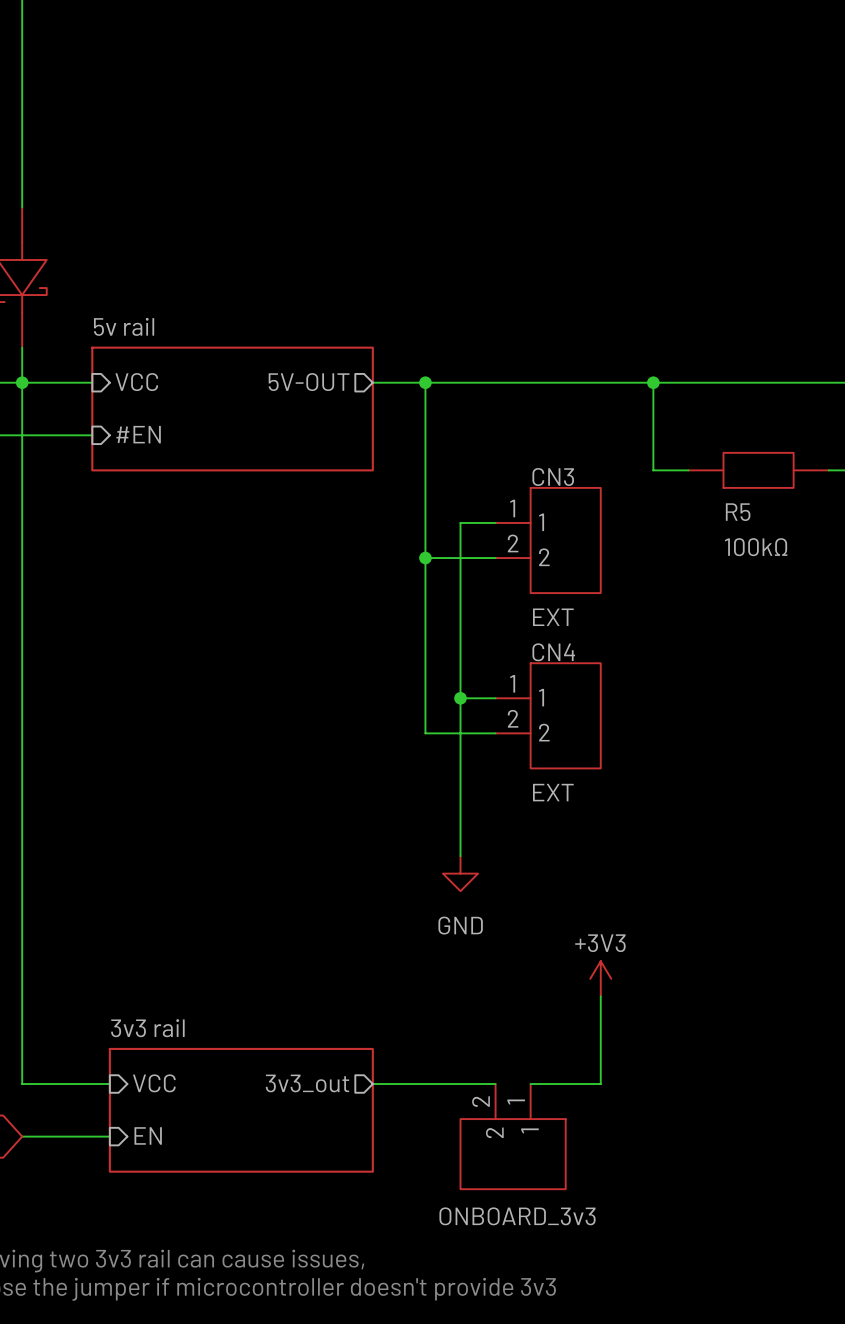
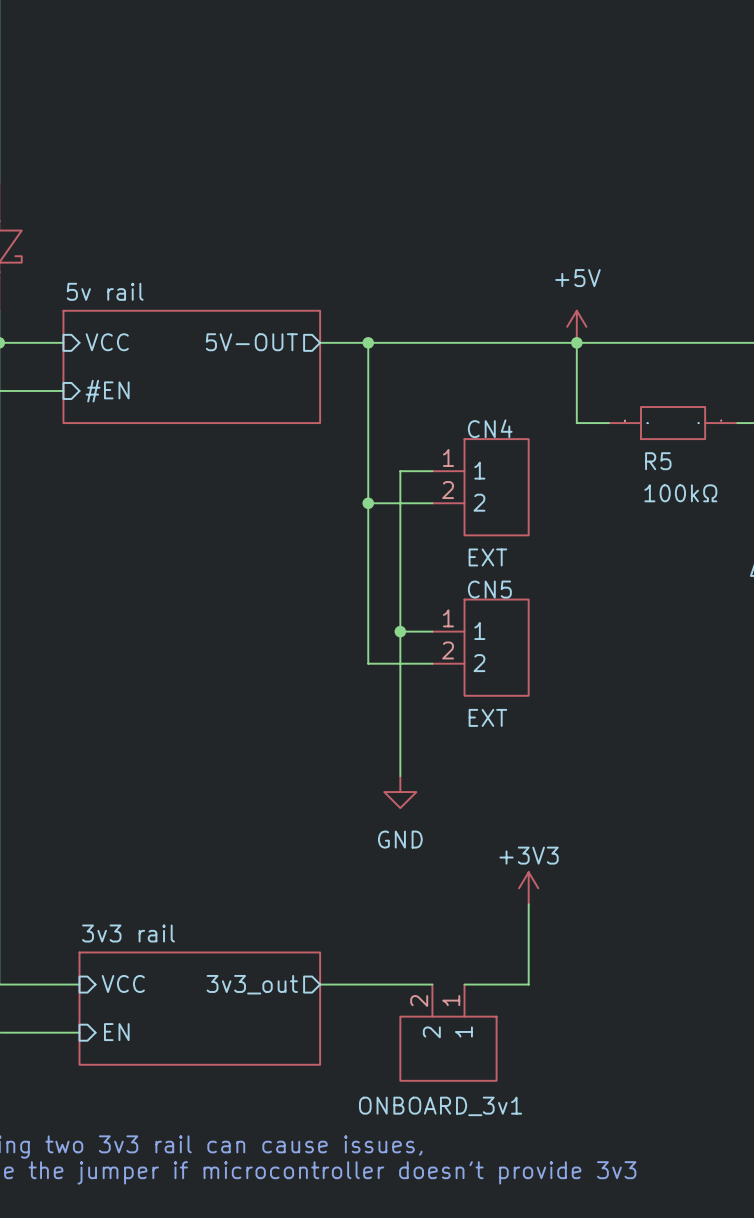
power symbol: none -> +5V (576, 326)
CN3 name: CN3 (553, 477) -> CN4 (490, 428)
CN4 name: CN4 (553, 652) -> CN5 (489, 589)
ONBOARD_3v3 name: ONBOARD_3v3 (517, 1216) -> ONBOARD_3v1 (440, 1106)

